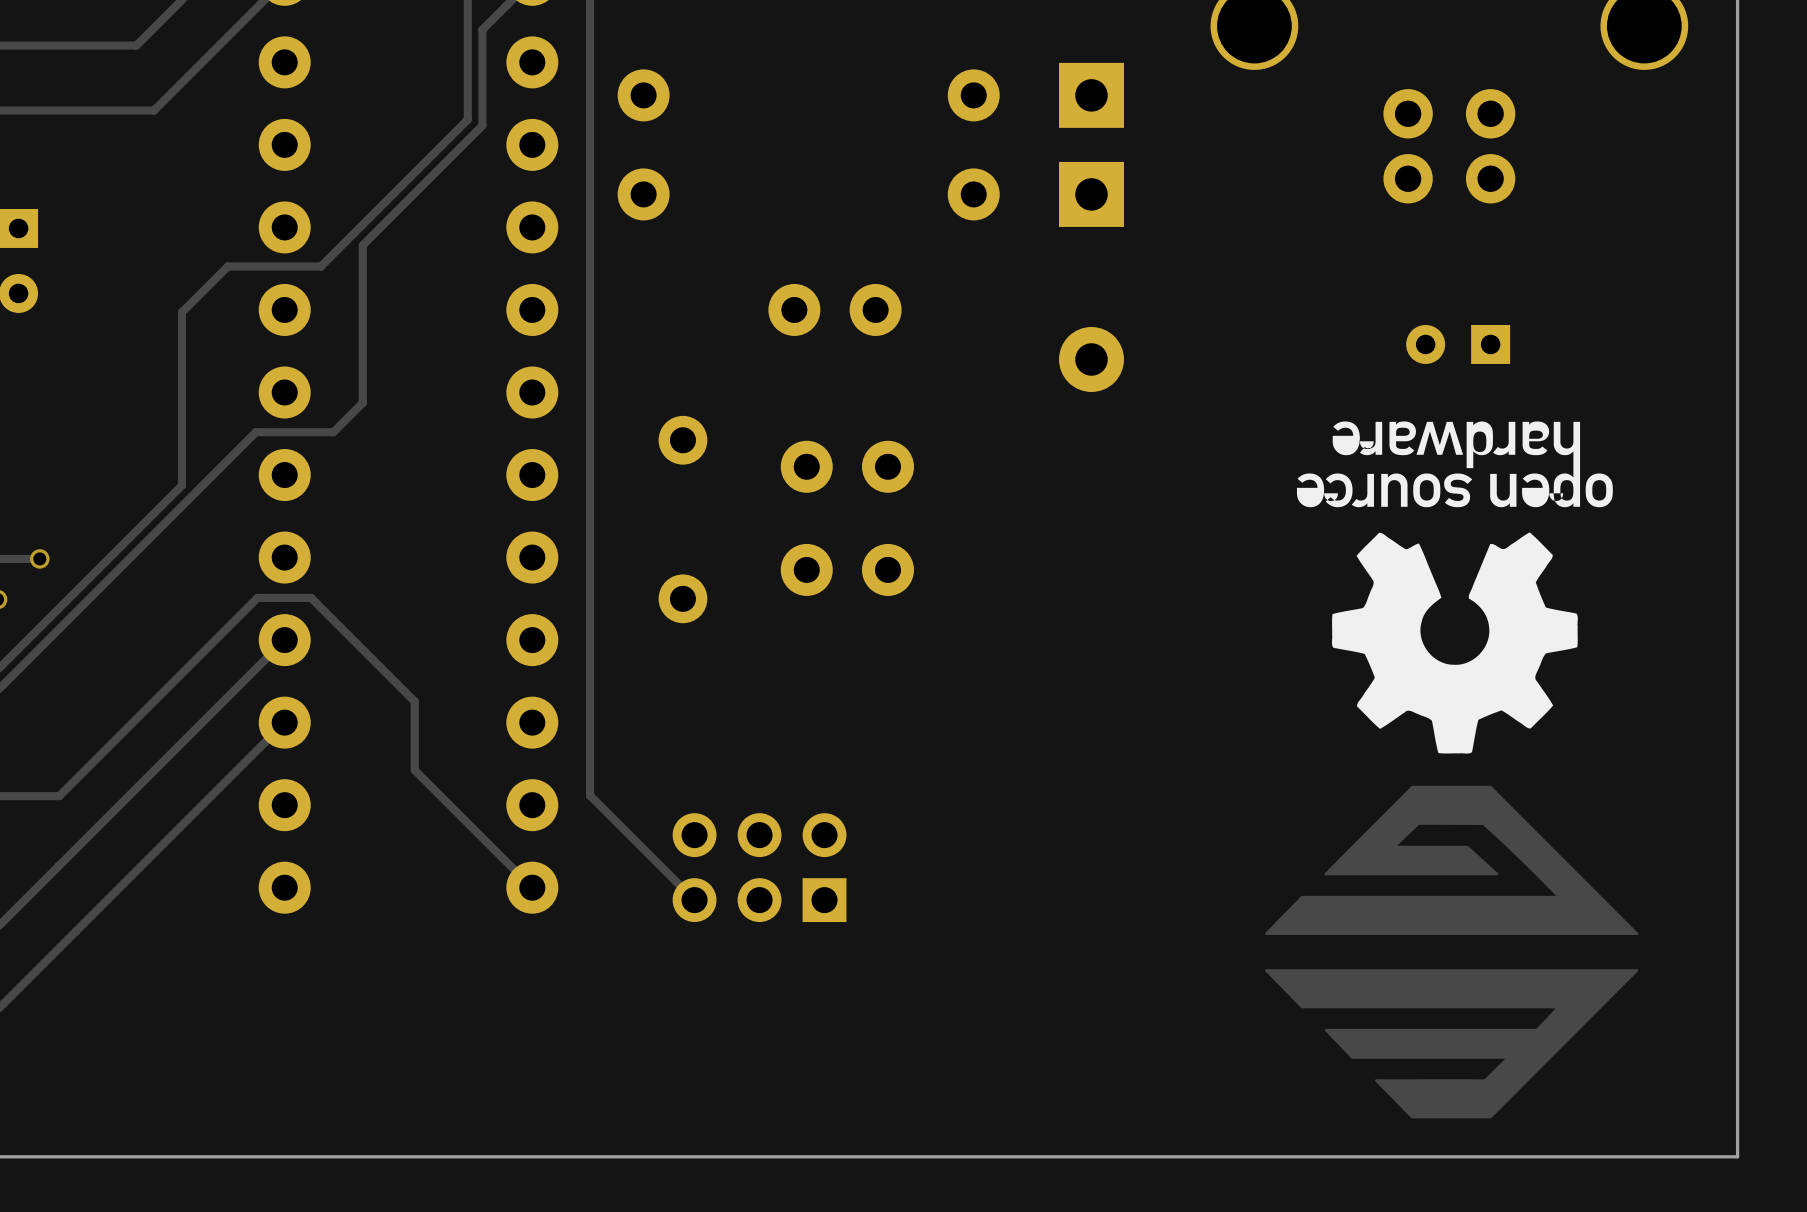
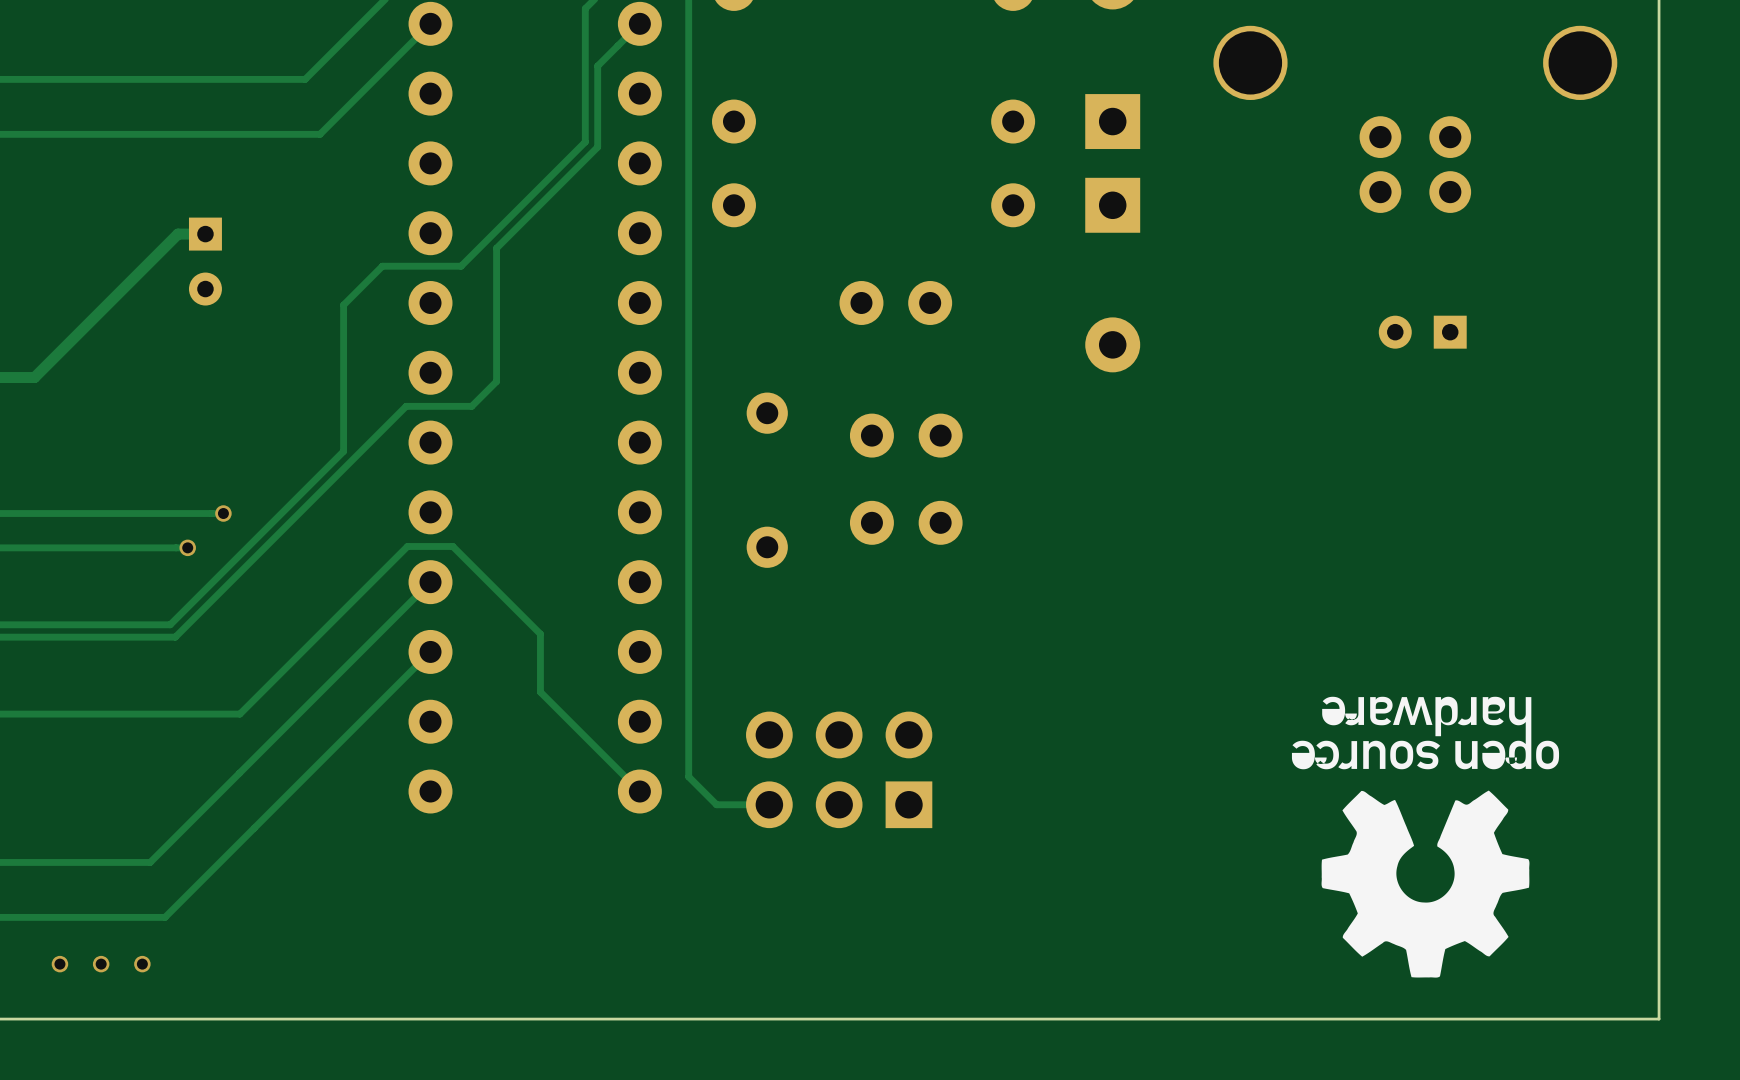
drawing position: (1454, 587) -> (1425, 837)
drawing: [1265, 785, 1639, 1119] -> none
track: (590, 795) (694, 900) -> (688, 713) (688, 776) (716, 804) (769, 804)
part footprint: [672, 813, 847, 923] -> [746, 711, 933, 829]

